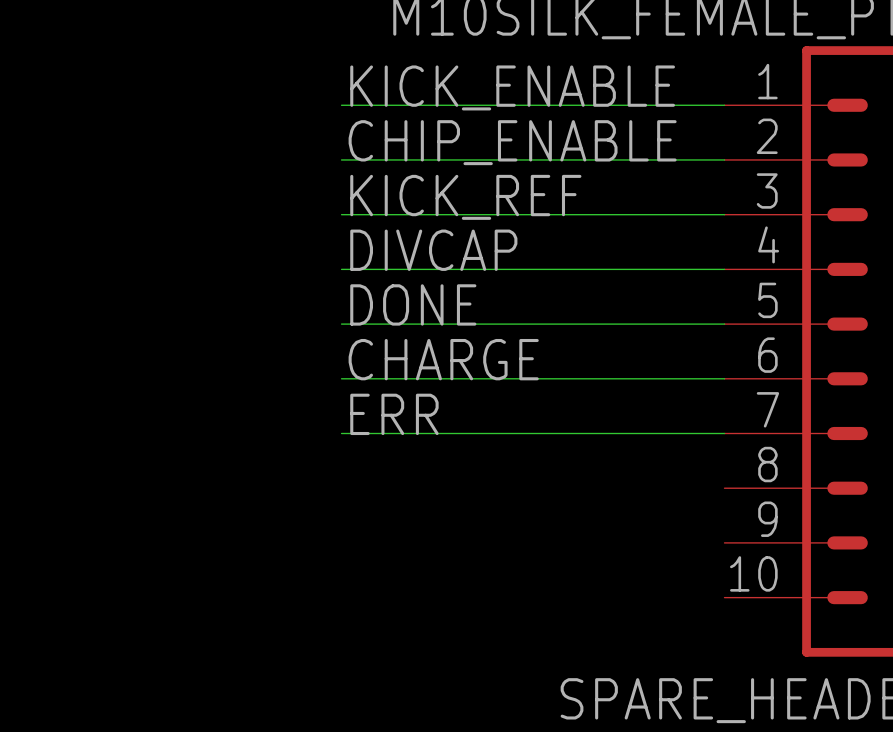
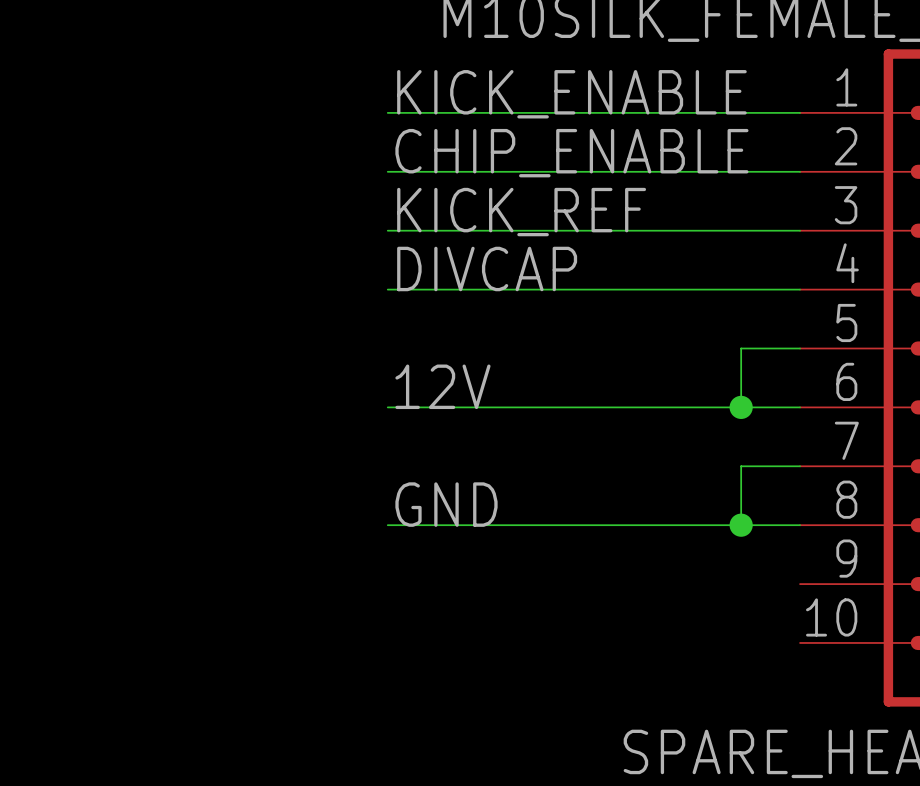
label: DONE (413, 304) -> none
wire: (341, 324) (669, 324) -> (741, 407) (741, 348)
label: CHARGE (443, 359) -> 12V (442, 386)
junction: none -> (741, 407)
label: ERR (394, 414) -> none
wire: (341, 433) (669, 433) -> (741, 525) (741, 466)
label: none -> GND (446, 504)
wire: none -> (387, 525) (800, 525)
junction: none -> (741, 525)

